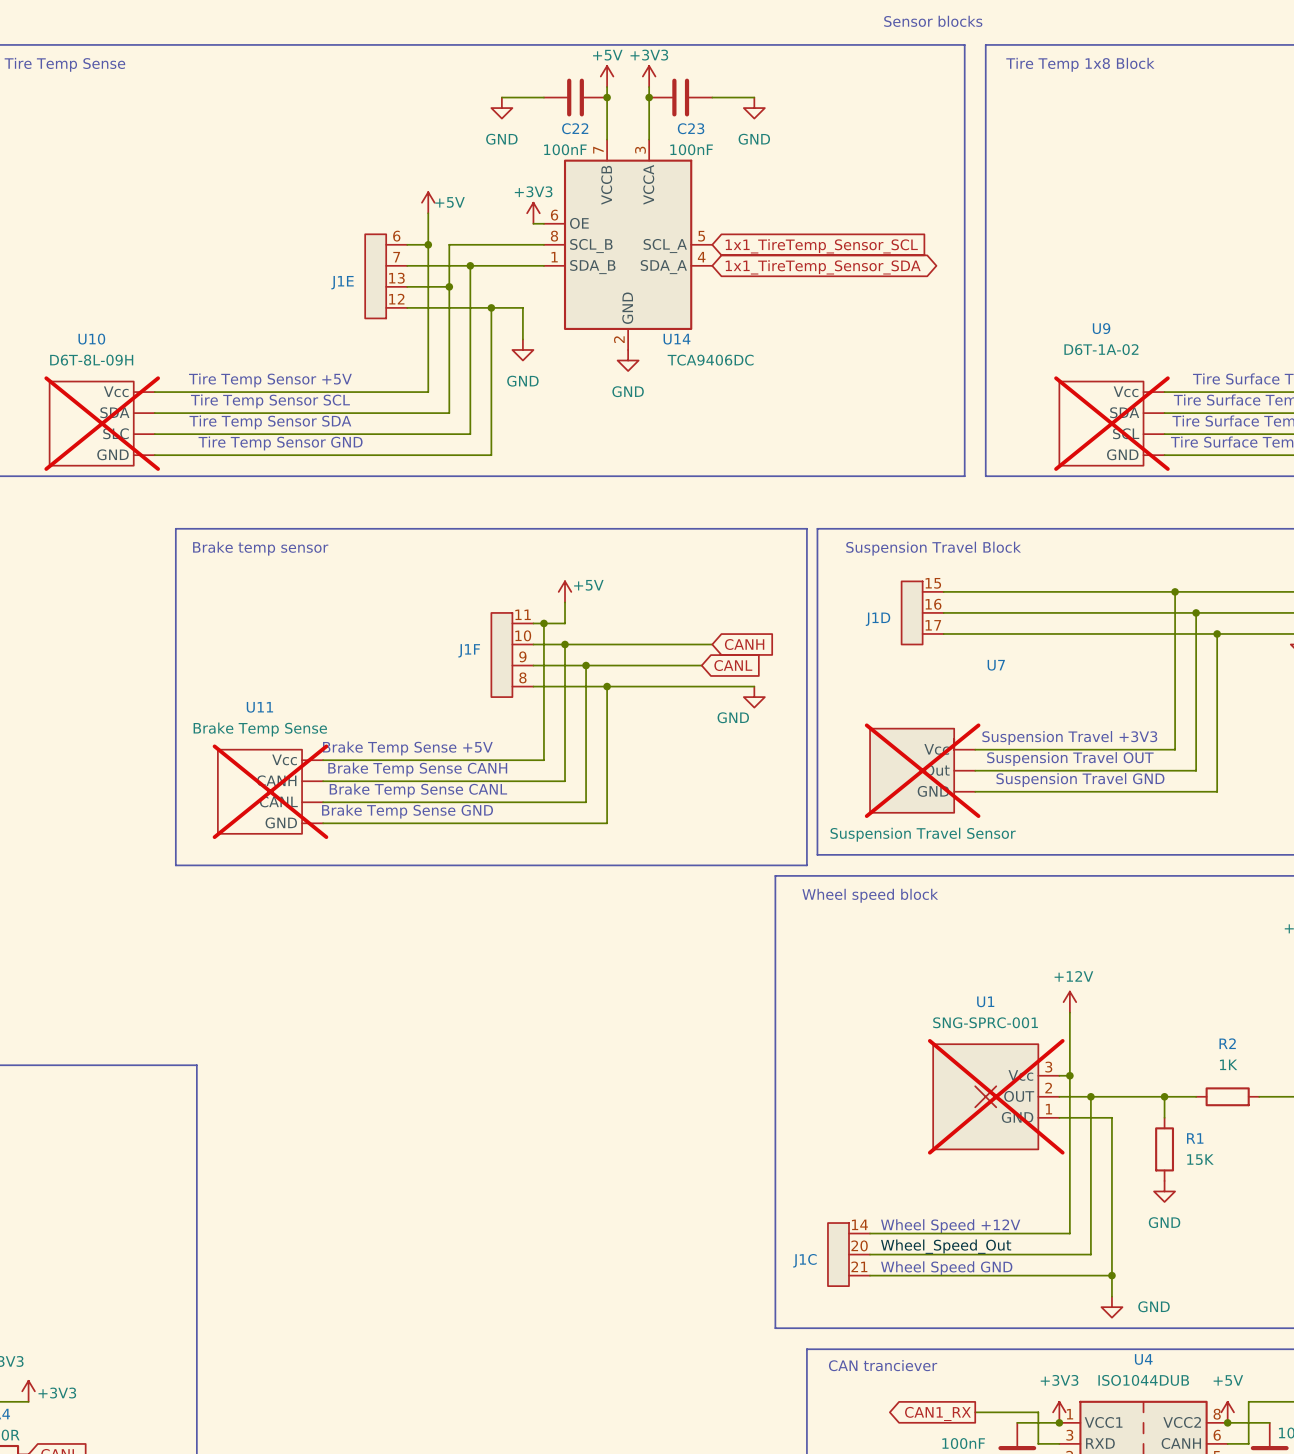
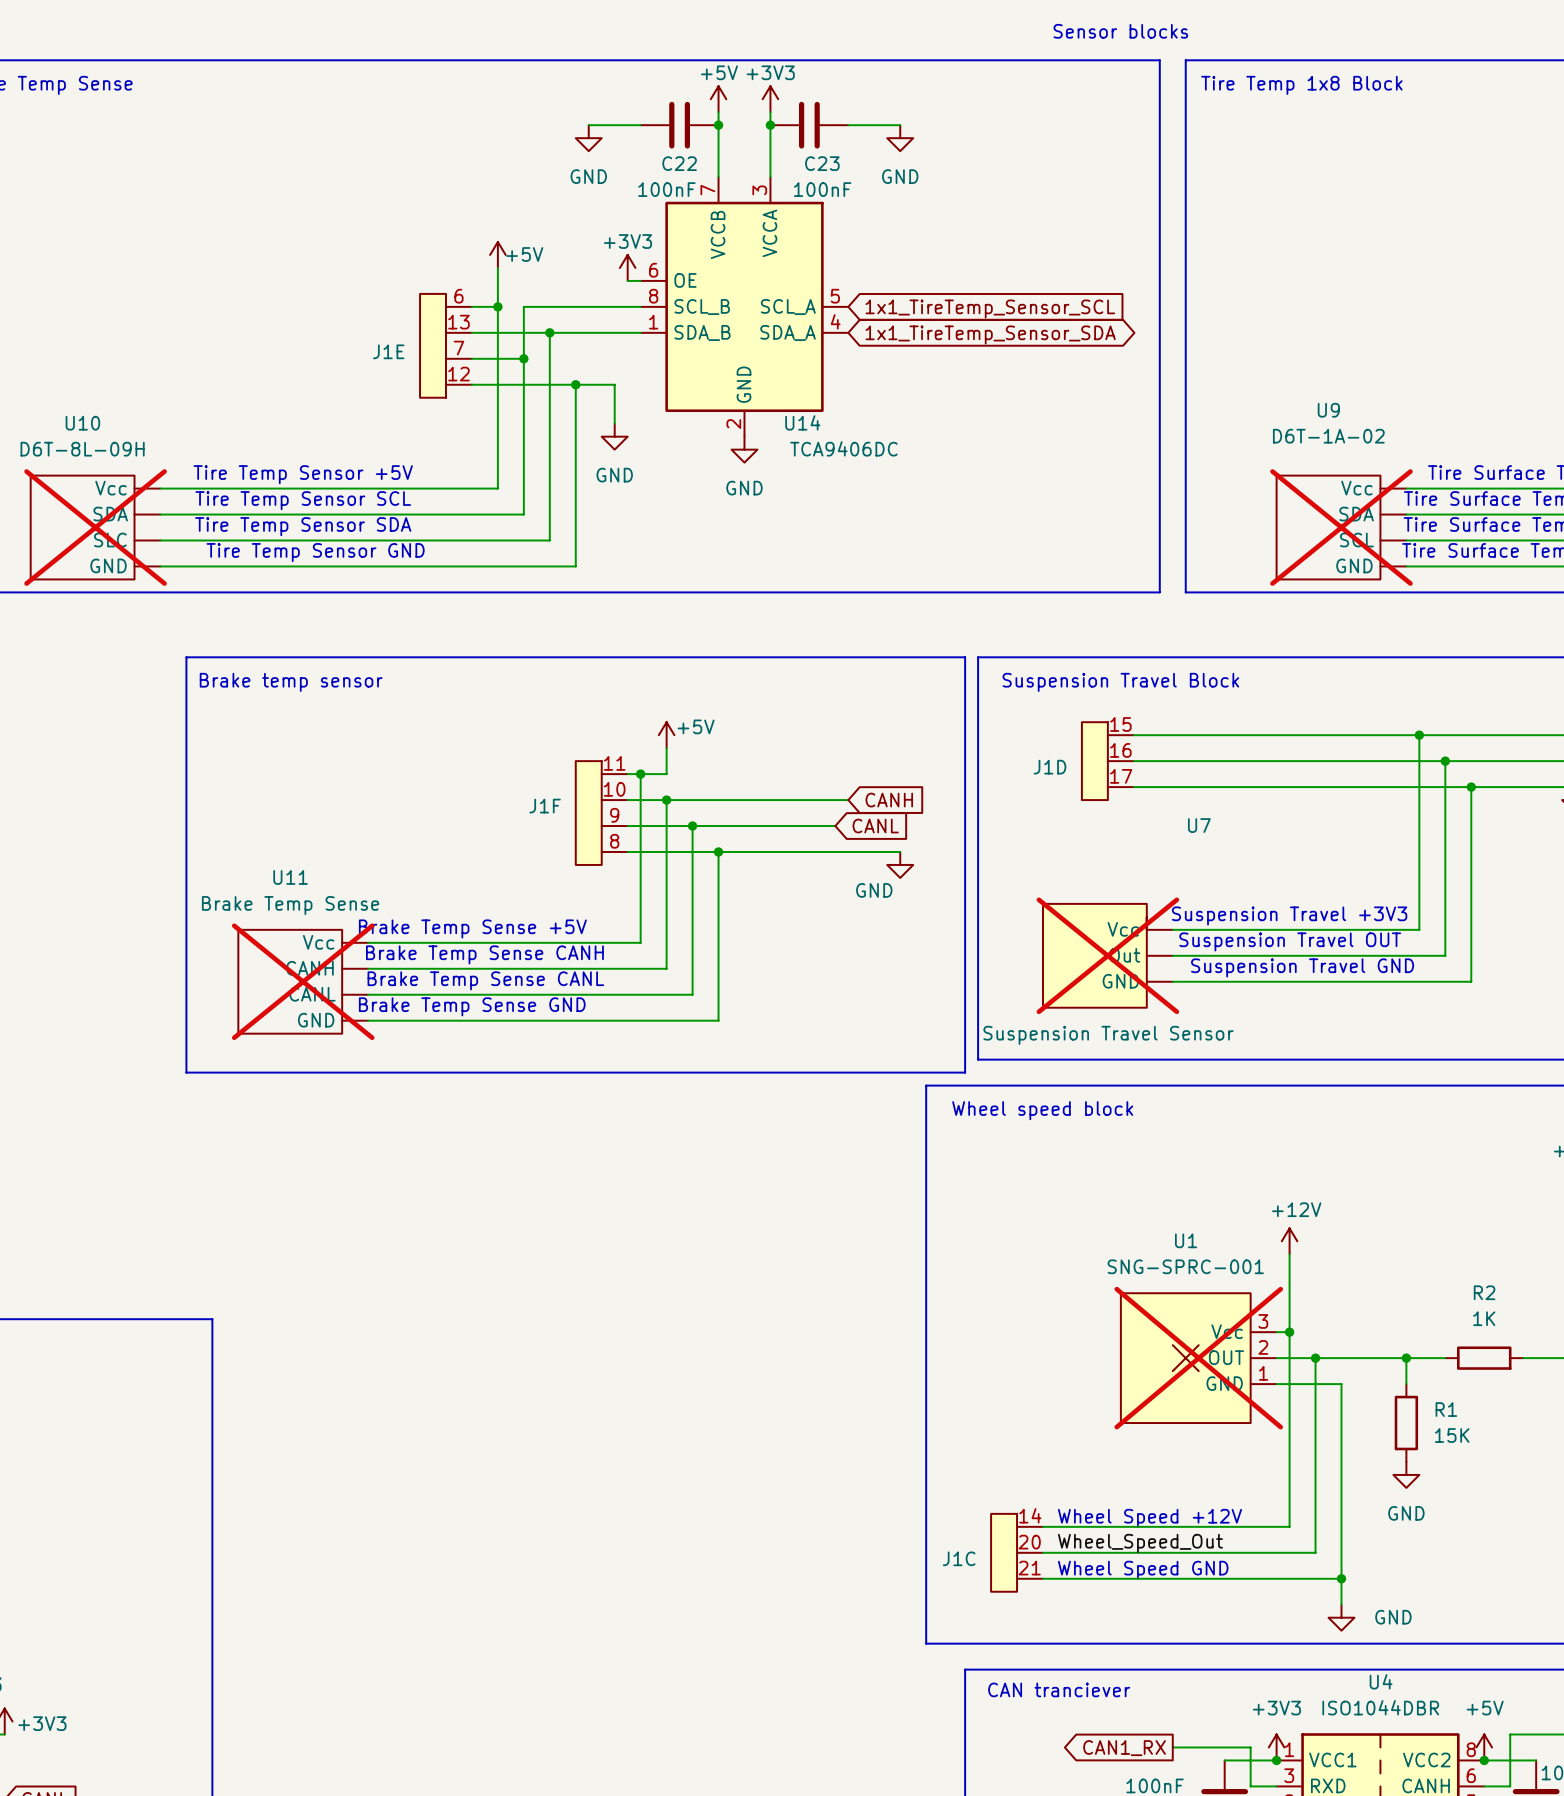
J1E pin number: 7 (396, 257) -> 13 (458, 322)
J1E pin number: 13 (396, 278) -> 7 (458, 348)
U4 value: ISO1044DUB (1143, 1380) -> ISO1044DBR (1380, 1707)

